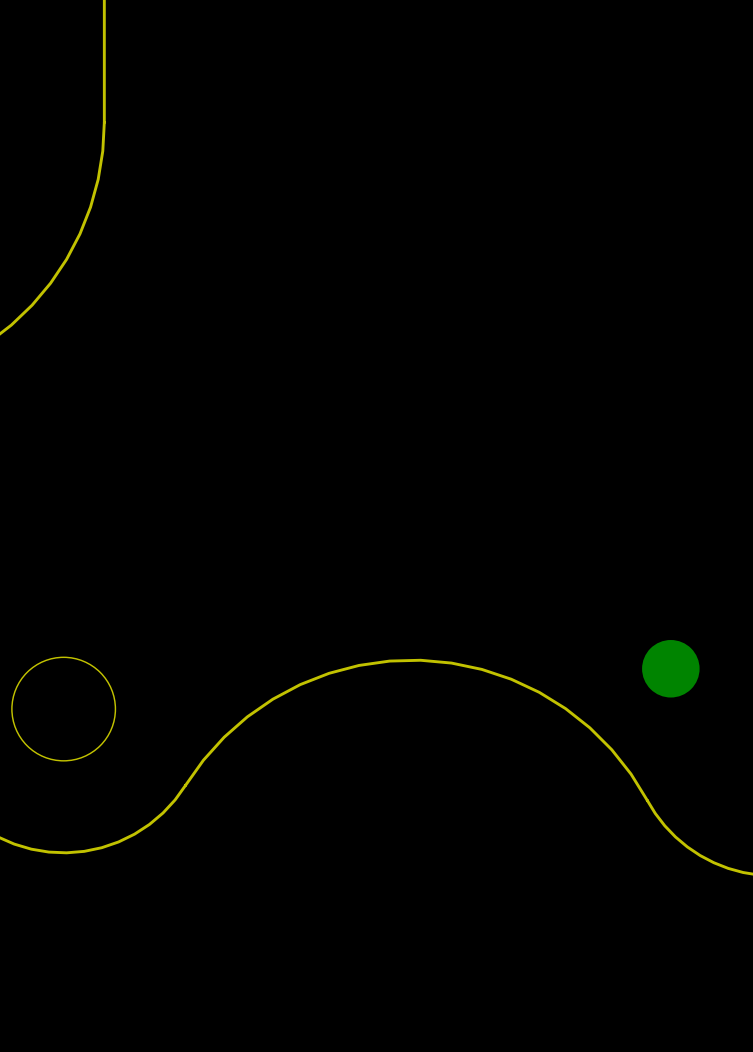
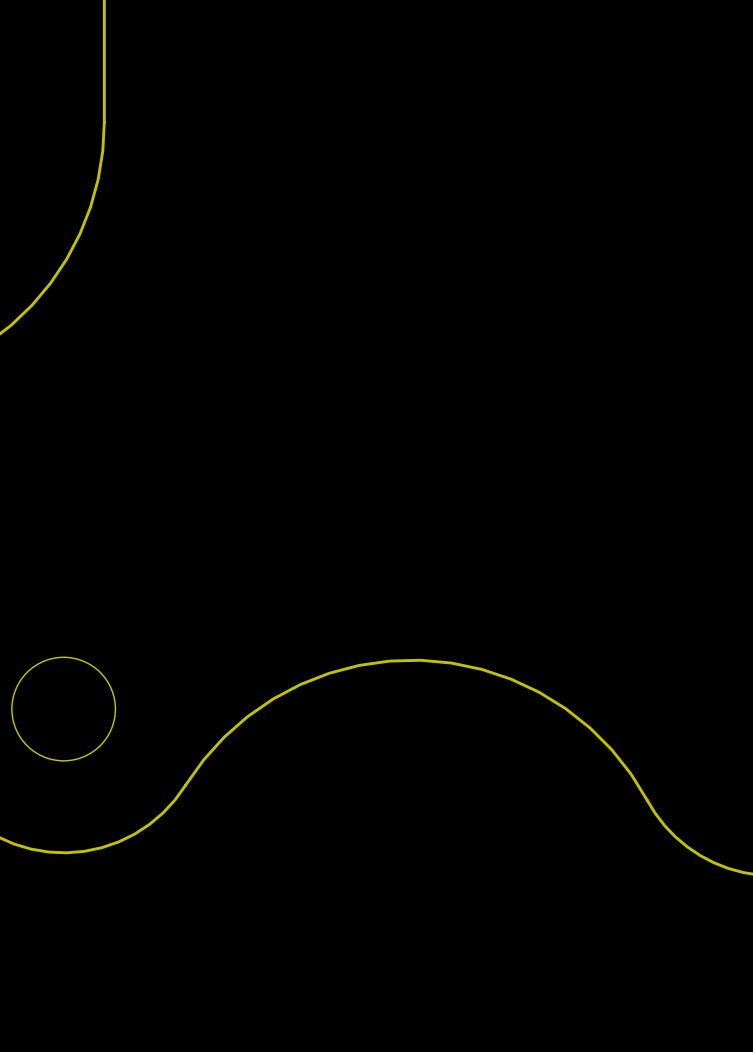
part: (670, 668) -> none

